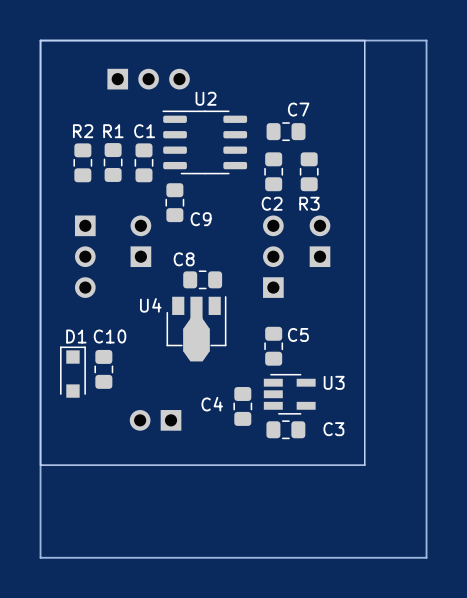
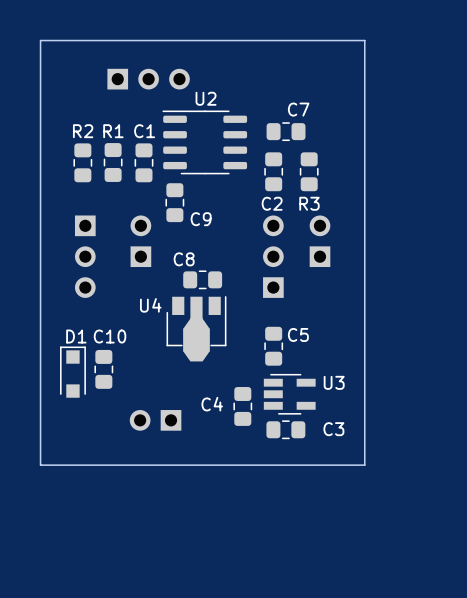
line: (40, 40) (426, 40) (426, 557) (40, 557) (40, 40) -> none

